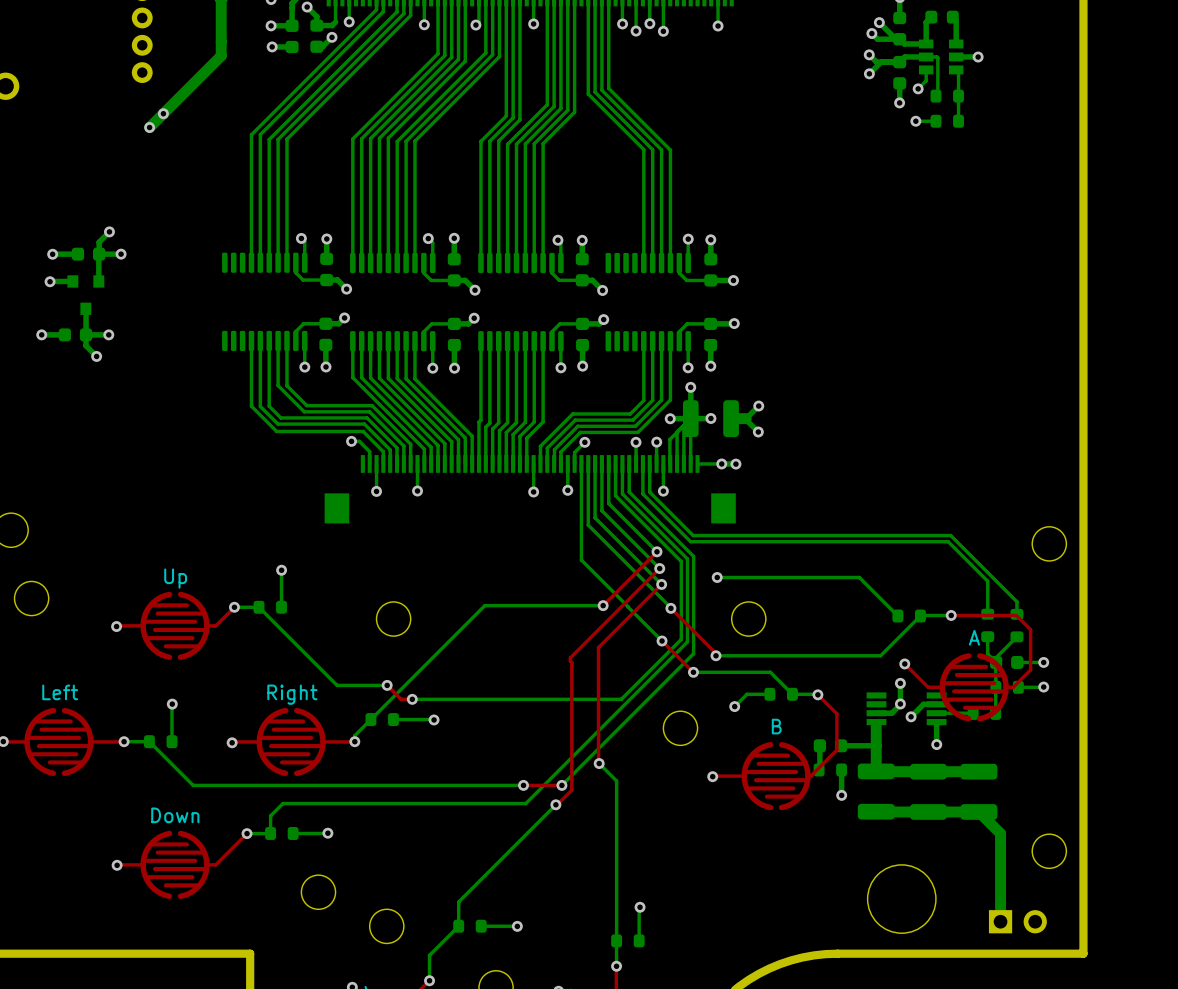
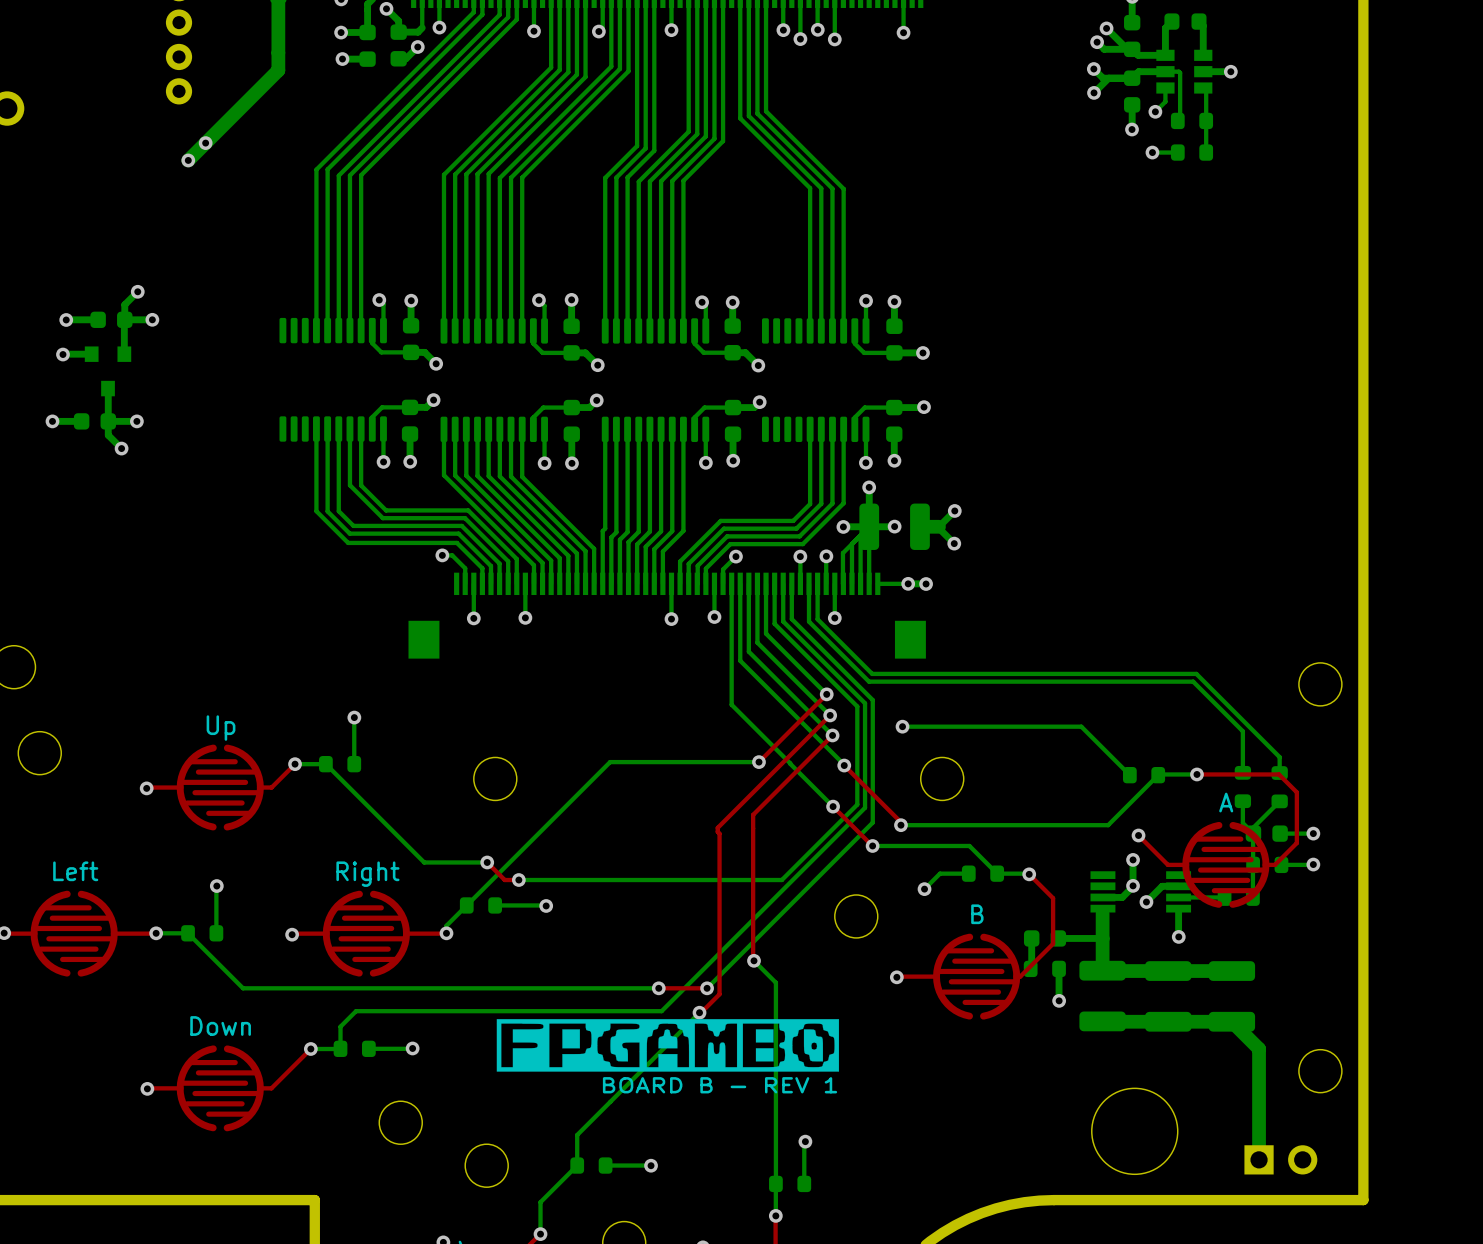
drawing: none -> [496, 1019, 840, 1072]
text: none -> BOARD B - REV 1 (720, 1085)

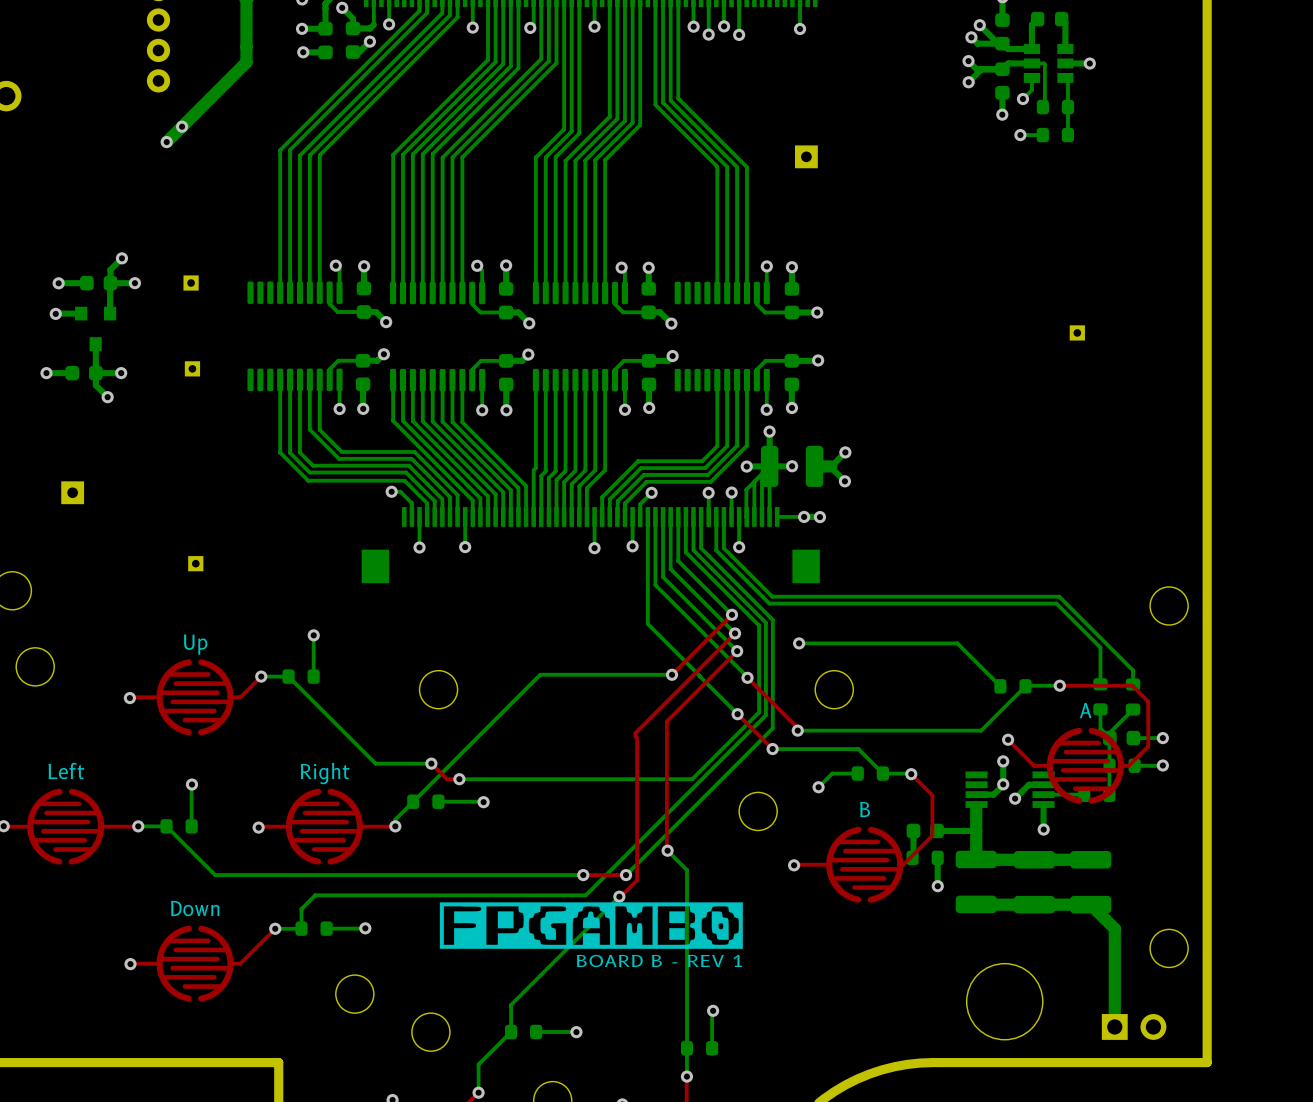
part: none -> (806, 156)
part: none -> (191, 283)
part: none -> (1077, 332)
part: none -> (192, 368)
part: none -> (72, 492)
part: none -> (195, 563)

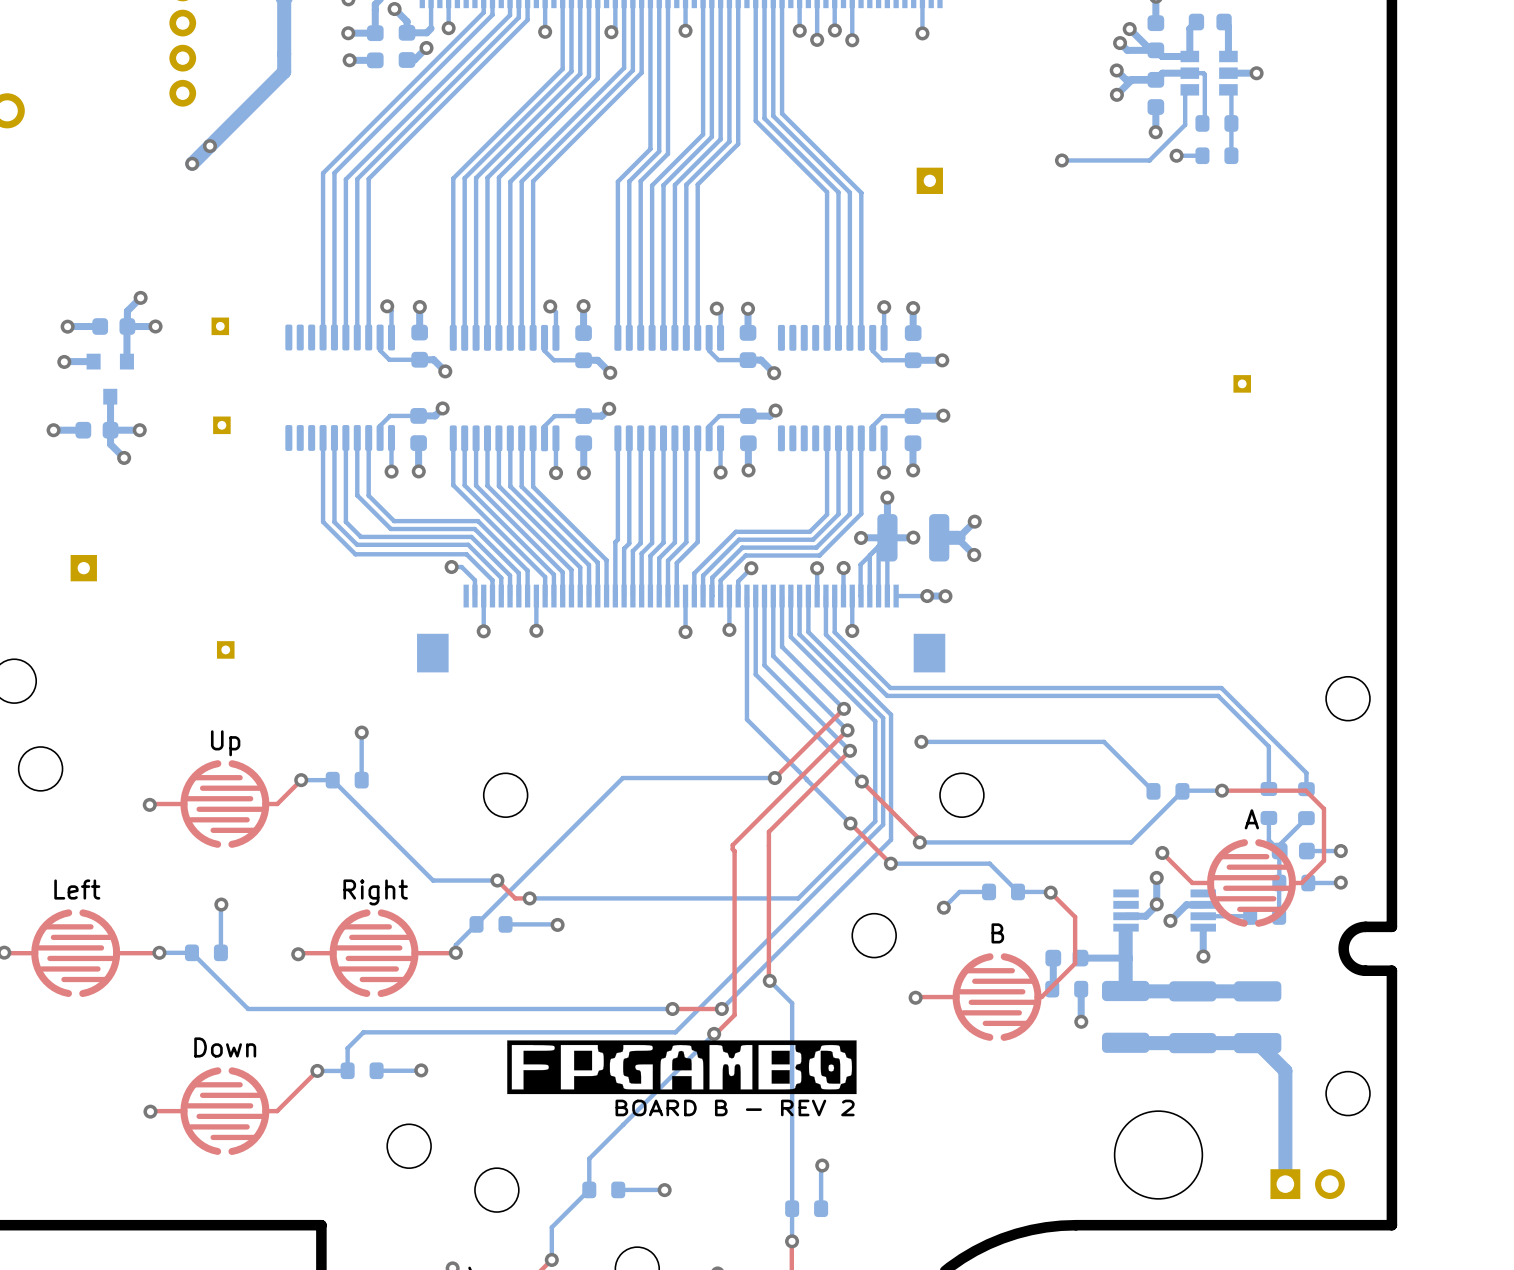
bottom track: (1031, 77) (1031, 90) (1022, 99) -> (1189, 89) (1185, 94) (1185, 124) (1149, 160) (1061, 160)
via: (1022, 99) -> none
via: none -> (1061, 160)
board edge: (1207, 803) (1207, 841) -> (1391, 926) (1357, 928) (1346, 937) (1343, 948) (1346, 959) (1357, 969) (1391, 970)
text: BOARD B - REV 1 (659, 960) -> BOARD B - REV 2 (735, 1107)

